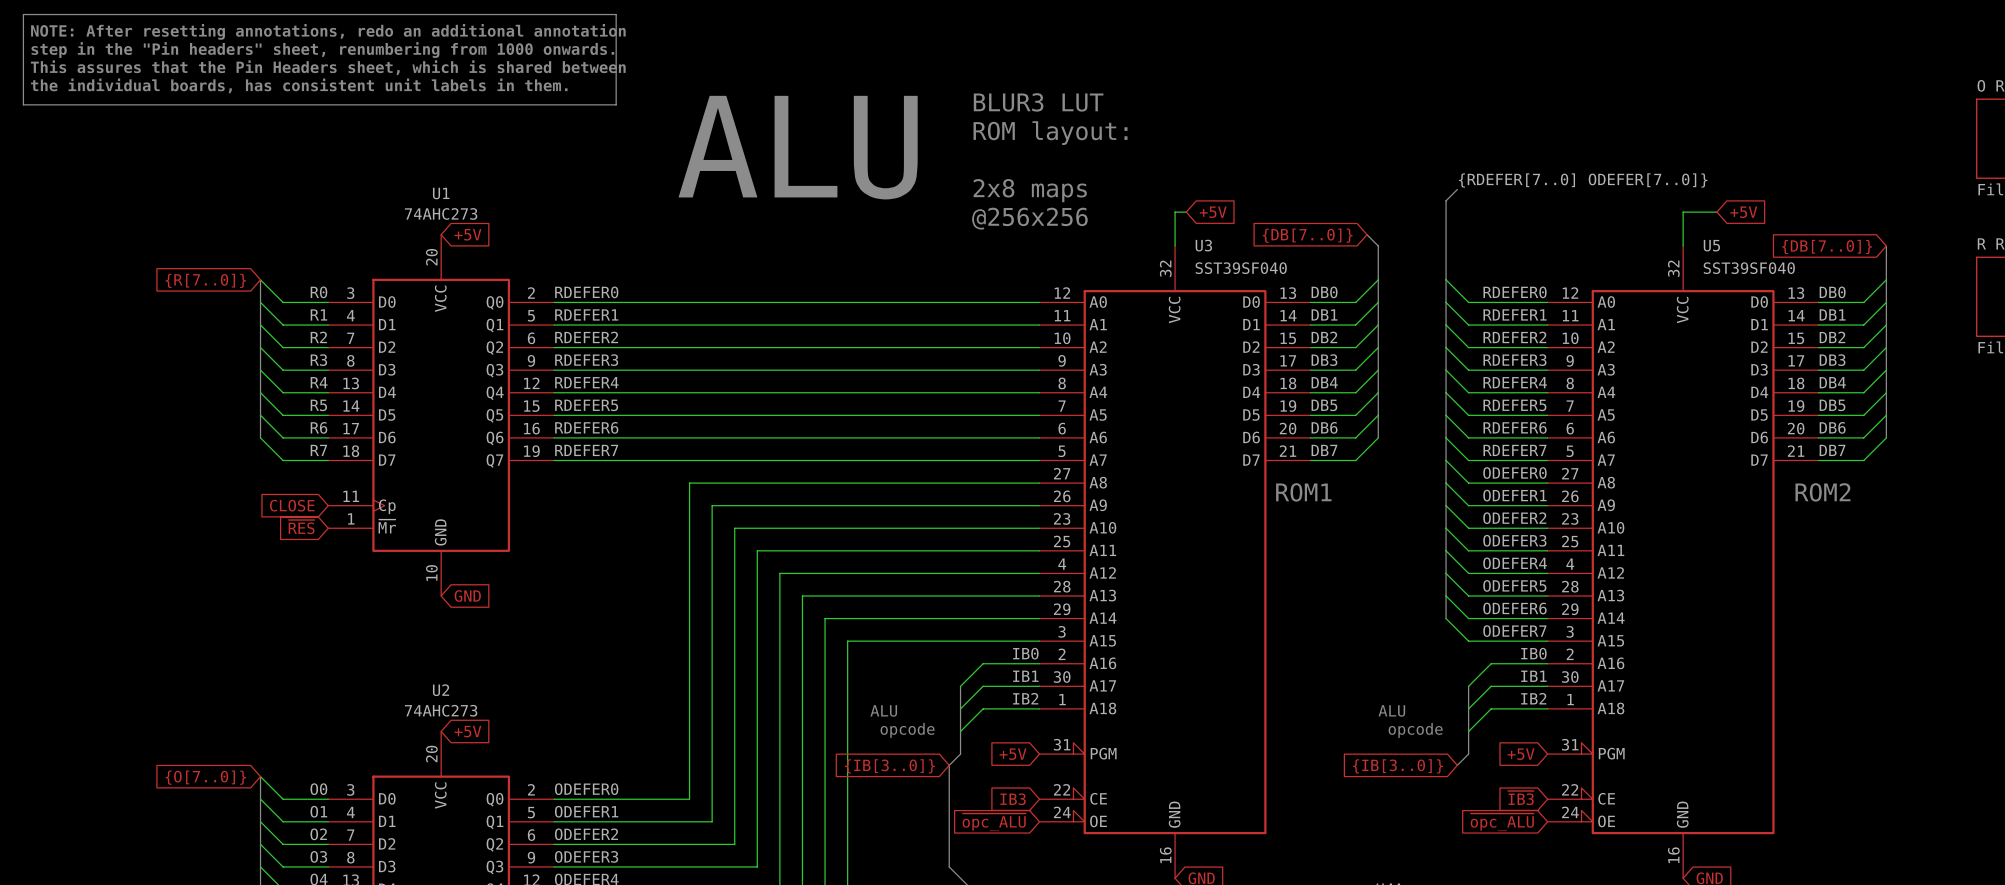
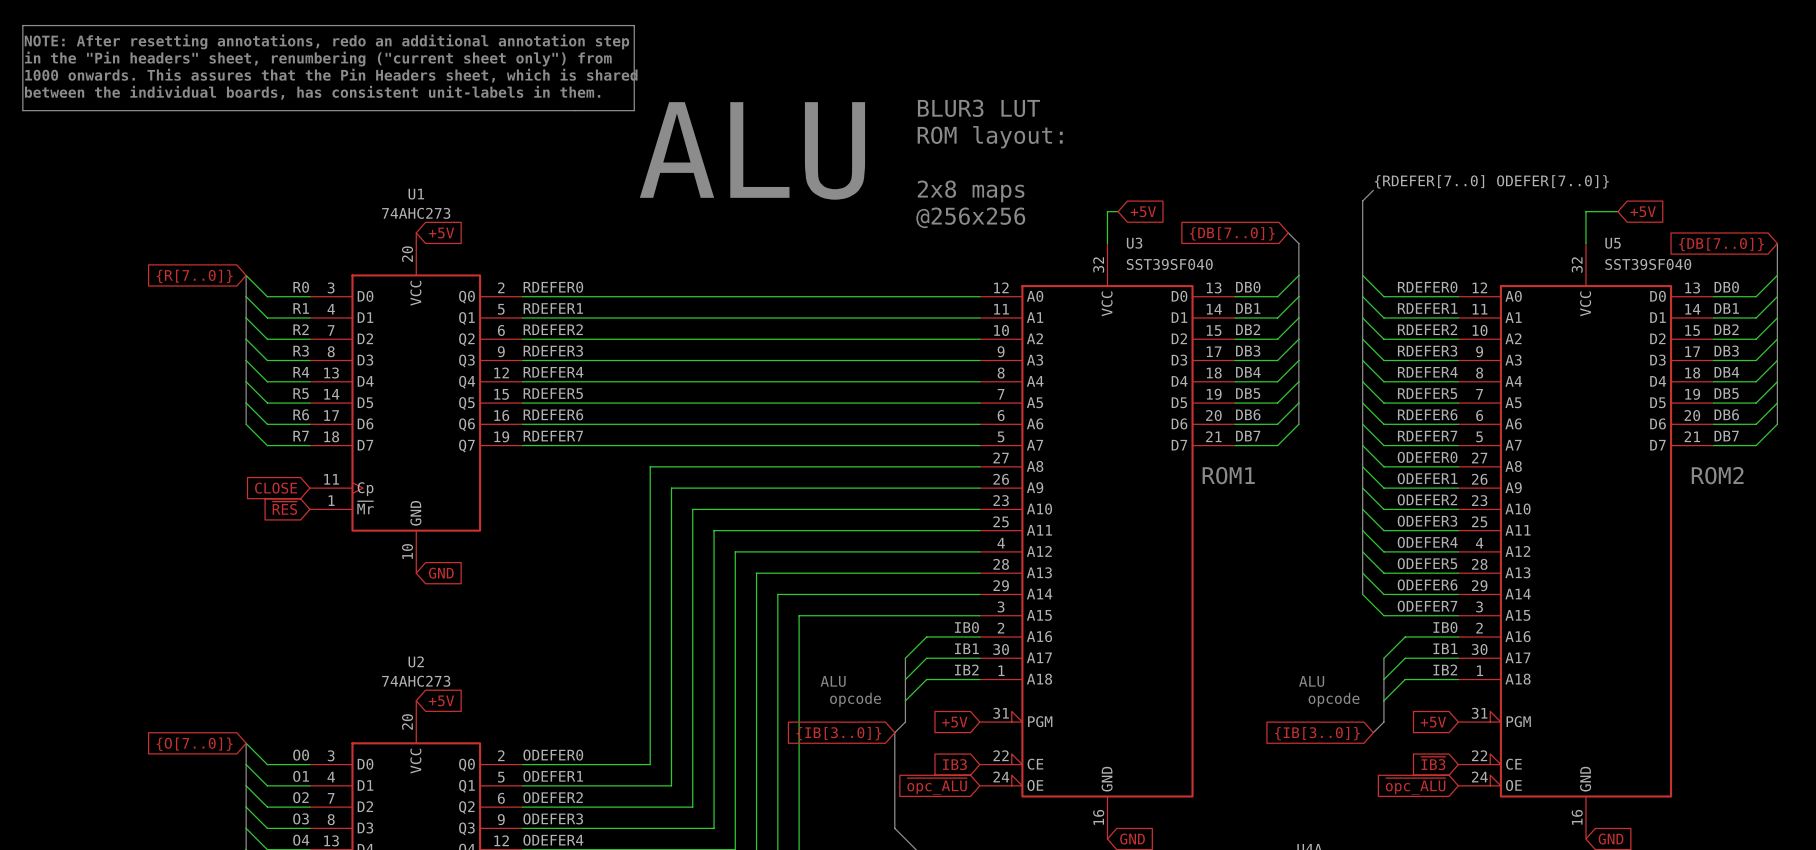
line: (616, 14) (616, 104) -> (581, 25) (634, 25) (634, 110) (581, 110)
text: NOTE: After resetting annotations, redo an additional annotation (328, 31) -> NOTE: After resetting annotations, redo an additional annotation step (326, 41)
text: step in the "Pin headers" sheet, renumbering from 1000 onwards. (322, 50) -> in the "Pin headers" sheet, renumbering ("current sheet only") from (318, 59)
text: This assures that the Pin Headers sheet, which is shared between (328, 67) -> 1000 onwards. This assures that the Pin Headers sheet, which is shared (331, 75)
text: the individual boards, has consistent unit labels in them. (299, 85) -> between the individual boards, has consistent unit-labels in them. (312, 92)

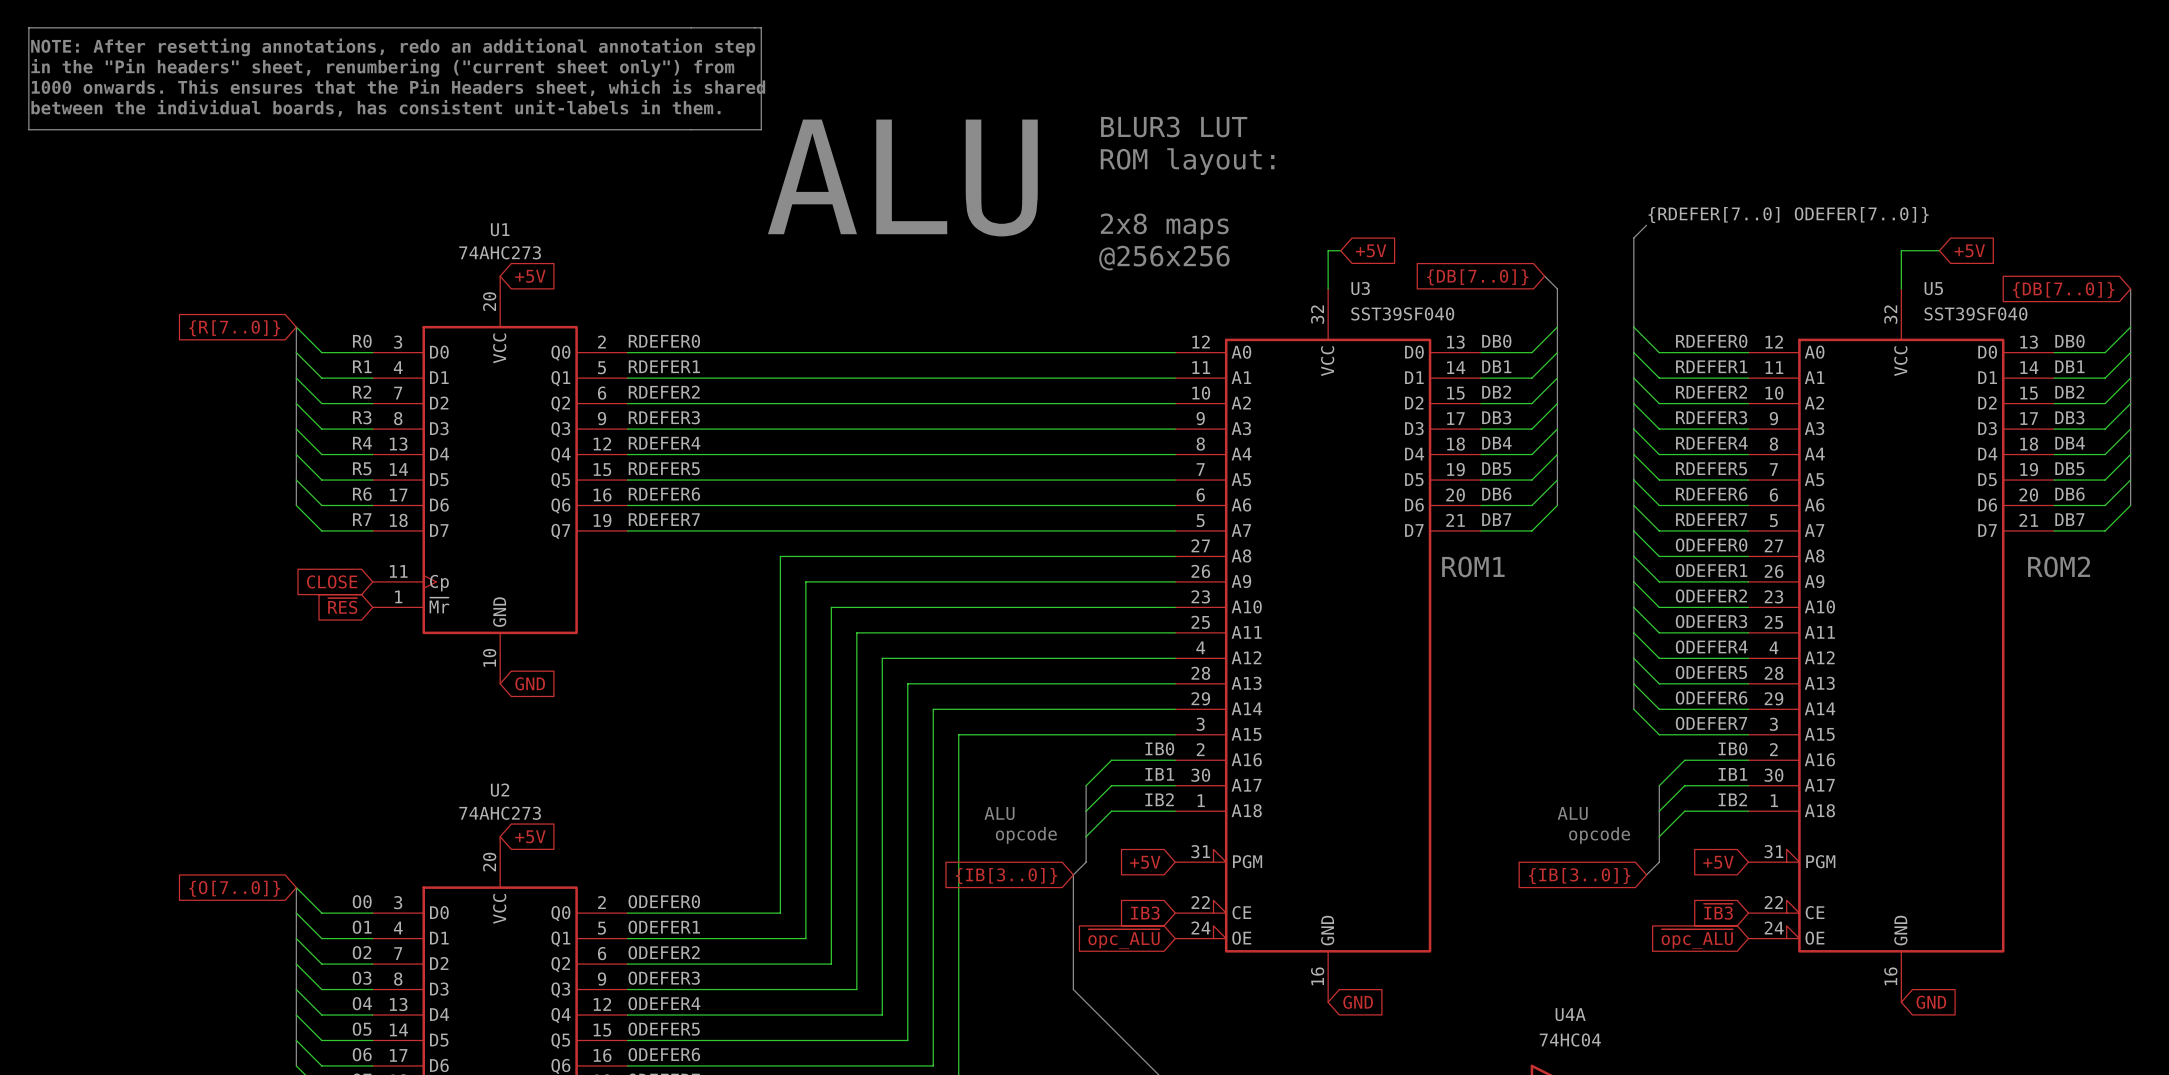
text: 1000 onwards. This assures that the Pin Headers sheet, which is shared (331, 75) -> 1000 onwards. This ensures that the Pin Headers sheet, which is shared (398, 87)

